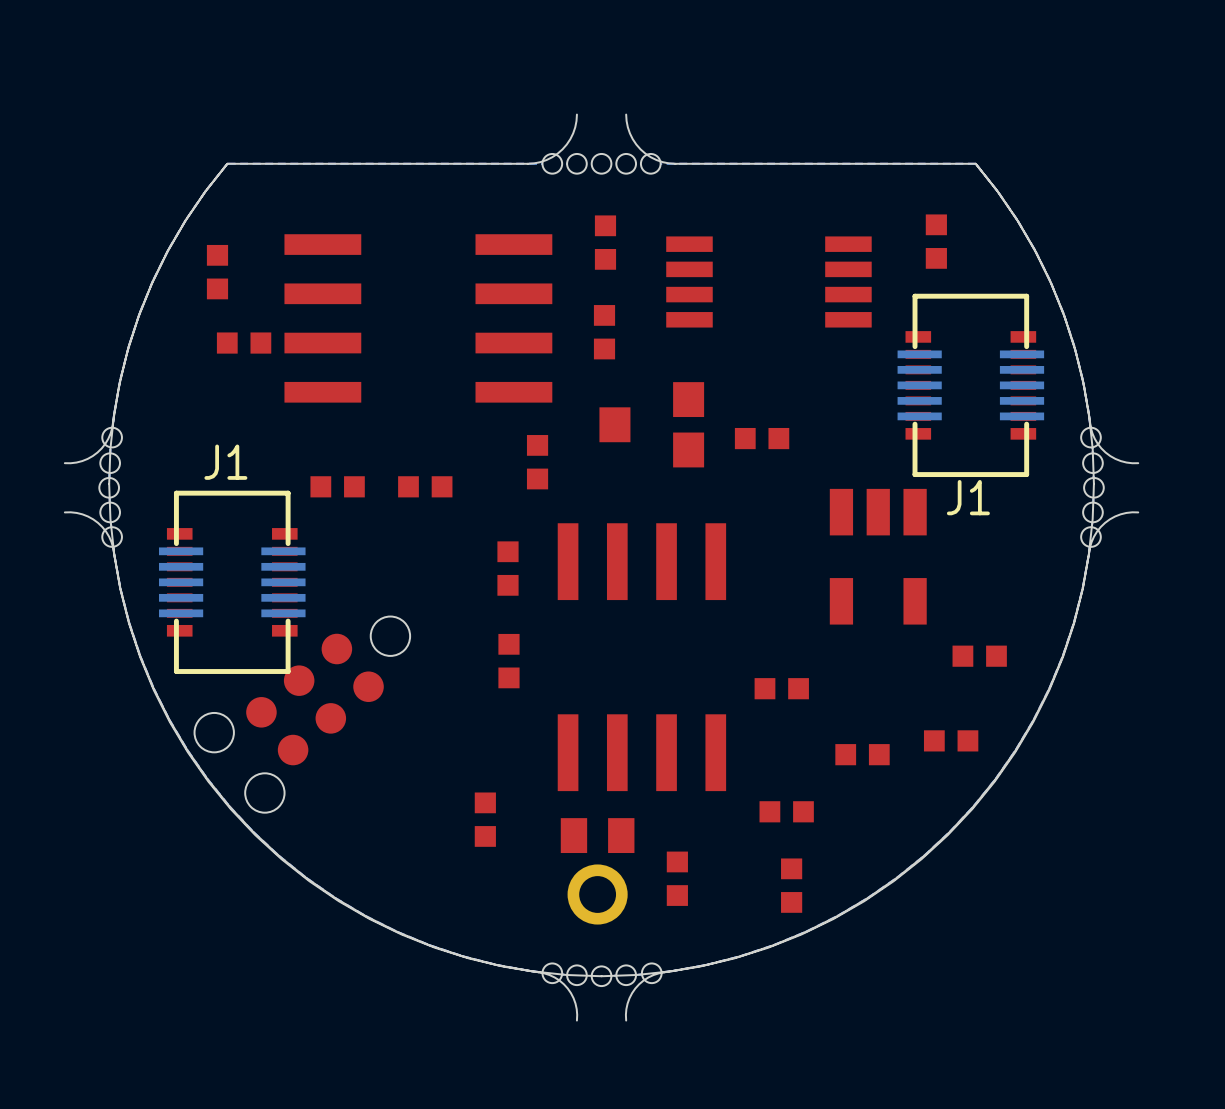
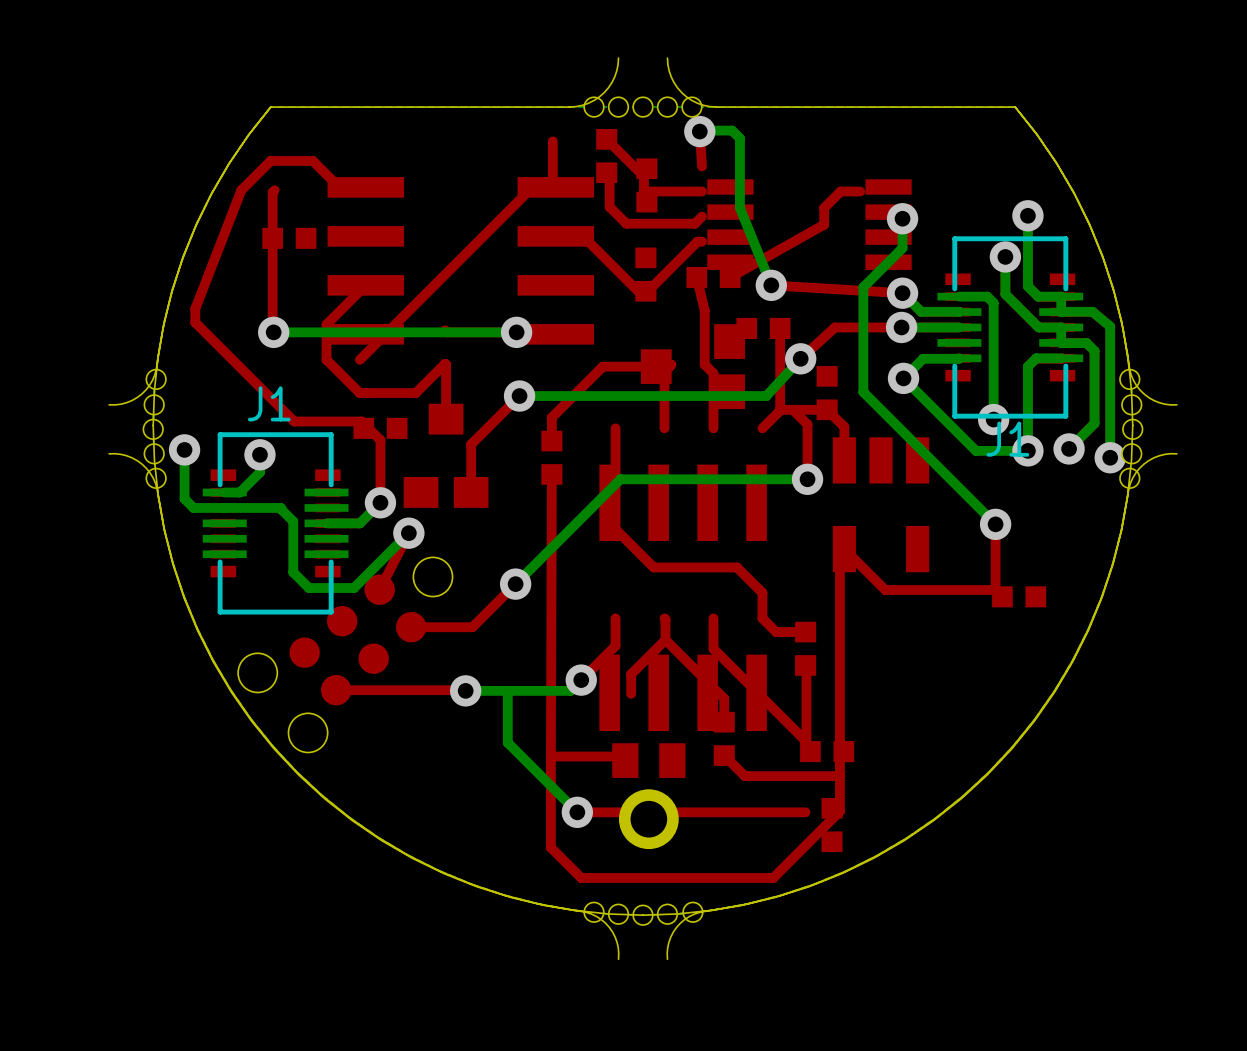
bottom track: none -> (699, 131) (732, 130) (739, 138) (739, 207) (771, 285)
top track: none -> (699, 131) (702, 166)
via: none -> (699, 131)
top track: none -> (606, 139) (643, 176) (645, 191) (702, 191)
top track: none -> (552, 141) (552, 190) (529, 190) (359, 359)
part: none -> (606, 156)
top track: none -> (606, 172) (609, 175) (609, 206) (626, 223) (694, 223) (702, 216)
part: (936, 241) -> none
top track: none -> (274, 190) (272, 192) (273, 332)
top track: none -> (362, 190) (342, 190) (312, 160) (270, 160) (241, 190) (195, 308) (195, 322) (294, 421) (361, 421) (380, 440) (380, 502) (359, 523) (327, 523)
top track: none -> (860, 191) (840, 191) (824, 207) (824, 224) (730, 277)
part: (217, 272) -> none
bottom track: none -> (1027, 215) (1027, 286) (1038, 296) (1061, 296) (1061, 312) (1092, 311) (1110, 326) (1110, 457)
via: none -> (1027, 215)
bottom track: none -> (902, 218) (902, 248) (863, 287) (863, 392) (995, 524)
via: none -> (902, 218)
part: none -> (289, 238)
top track: none -> (552, 239) (586, 239) (642, 296) (697, 241) (702, 241)
bottom track: none -> (1005, 256) (1005, 294) (1038, 327) (1061, 327) (1061, 342)
via: none -> (1005, 256)
top track: none -> (696, 277) (704, 310) (704, 364) (713, 373) (713, 428)
part: none -> (713, 277)
part: (244, 343) -> none
top track: none -> (771, 285) (902, 293) (921, 312) (958, 312)
via: none -> (771, 285)
top track: none -> (362, 288) (326, 324) (326, 359) (359, 393) (415, 393) (445, 363) (446, 419)
bottom track: none -> (902, 293) (921, 311) (959, 311)
via: none -> (902, 293)
bottom track: none -> (959, 296) (987, 296) (993, 302) (993, 419)
via: none -> (901, 327)
top track: none -> (958, 327) (834, 327) (800, 358)
bottom track: none -> (959, 327) (901, 327)
part: none -> (763, 328)
top track: none -> (780, 328) (780, 410)
via: none -> (273, 332)
bottom track: none -> (516, 332) (273, 332)
via: none -> (516, 332)
bottom track: none -> (1061, 343) (1086, 343) (1094, 350) (1094, 423) (1069, 448)
bottom track: none -> (800, 358) (766, 396) (519, 396)
via: none -> (800, 358)
bottom track: none -> (1061, 358) (1036, 358) (1027, 366) (1027, 450) (976, 450) (903, 378) (923, 358) (958, 358)
top track: none -> (671, 364) (664, 371) (664, 428)
top track: none -> (669, 366) (602, 366) (551, 417) (551, 441)
via: none -> (903, 378)
part rotation: 0° (762, 438) -> 90° clockwise (827, 393)
top track: none -> (519, 396) (471, 444) (471, 492)
via: none -> (519, 396)
part: (537, 462) -> none
top track: none -> (792, 409) (807, 424) (807, 479)
part footprint: [398, 476, 453, 498] -> [403, 403, 489, 508]
via: none -> (993, 419)
top track: none -> (615, 428) (615, 529) (653, 567) (737, 567) (762, 592) (762, 618) (776, 632) (805, 632)
top track: none -> (762, 428) (781, 409) (827, 409) (844, 427) (844, 460)
via: none -> (1069, 448)
bottom track: none -> (184, 449) (184, 498) (193, 507) (280, 507) (293, 521) (293, 572) (308, 588) (354, 588) (408, 533)
via: none -> (184, 449)
via: none -> (1027, 450)
bottom track: none -> (259, 454) (259, 472) (239, 492) (224, 492)
via: none -> (259, 454)
part: none -> (551, 457)
via: none -> (1110, 457)
top track: none -> (551, 474) (550, 756)
bottom track: none -> (807, 479) (620, 479) (515, 584)
via: none -> (807, 479)
part position: (878, 556) -> (881, 504)
bottom track: none -> (380, 502) (359, 523) (326, 523)
via: none -> (380, 502)
part: (508, 568) -> none
top track: none -> (995, 524) (994, 589) (885, 589) (844, 549) (839, 553) (839, 811) (773, 877) (581, 877) (550, 847) (550, 756)
via: none -> (995, 524)
top track: none -> (408, 533) (379, 589)
via: none -> (408, 533)
top track: none -> (515, 584) (472, 627) (411, 627)
via: none -> (515, 584)
part: (508, 661) -> none
top track: none -> (615, 618) (615, 645) (581, 680)
top track: none -> (664, 618) (665, 639)
top track: none -> (713, 618) (713, 648) (806, 741) (805, 665)
part rotation: 0° (781, 688) -> 90° clockwise (805, 648)
top track: none -> (665, 639) (631, 674) (631, 693)
top track: none -> (665, 639) (724, 698) (724, 722)
bottom track: none -> (581, 680) (570, 690) (465, 690)
via: none -> (581, 680)
part: (951, 740) -> none
top track: none -> (336, 690) (465, 690)
via: none -> (465, 690)
bottom track: none -> (507, 690) (507, 742) (577, 812)
part: (862, 754) -> none
top track: none -> (724, 755) (744, 776) (839, 776)
top track: none -> (550, 756) (621, 756) (625, 760)
part: (485, 819) -> none
part position: (597, 871) -> (648, 796)
via: none -> (577, 812)
top track: none -> (805, 812) (577, 812)
part position: (677, 878) -> (724, 738)

